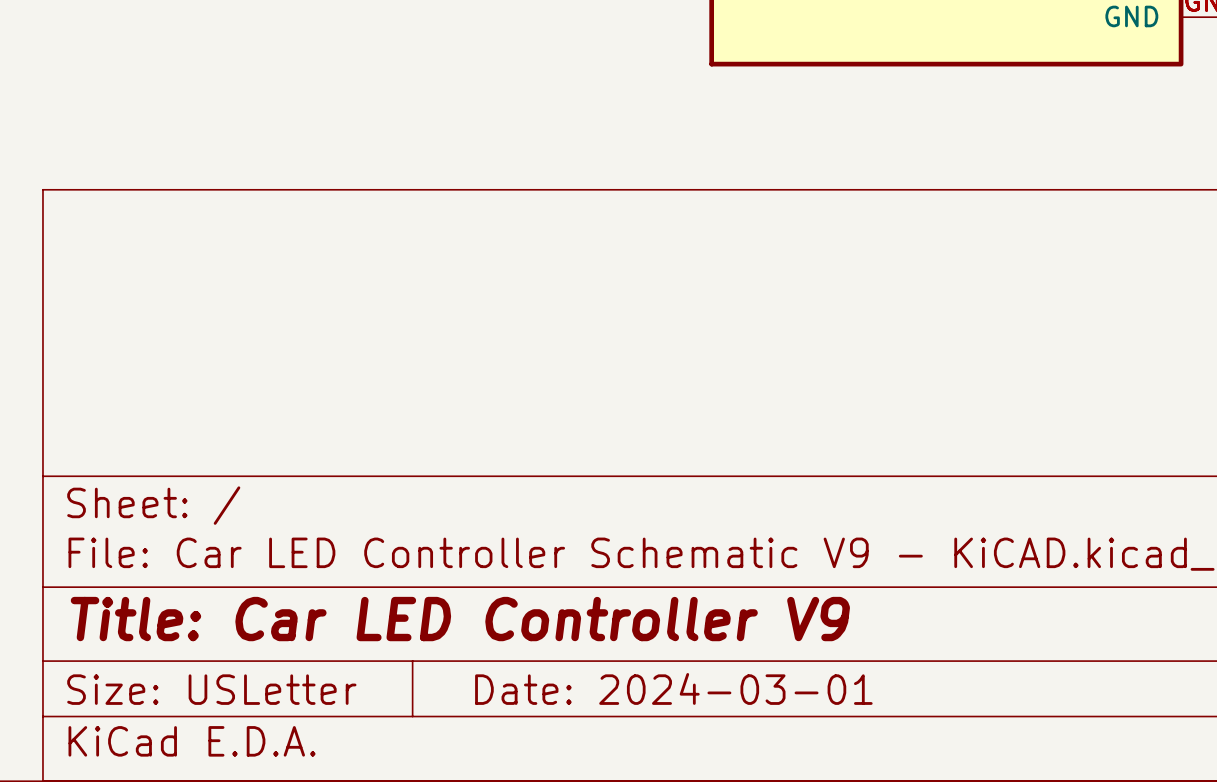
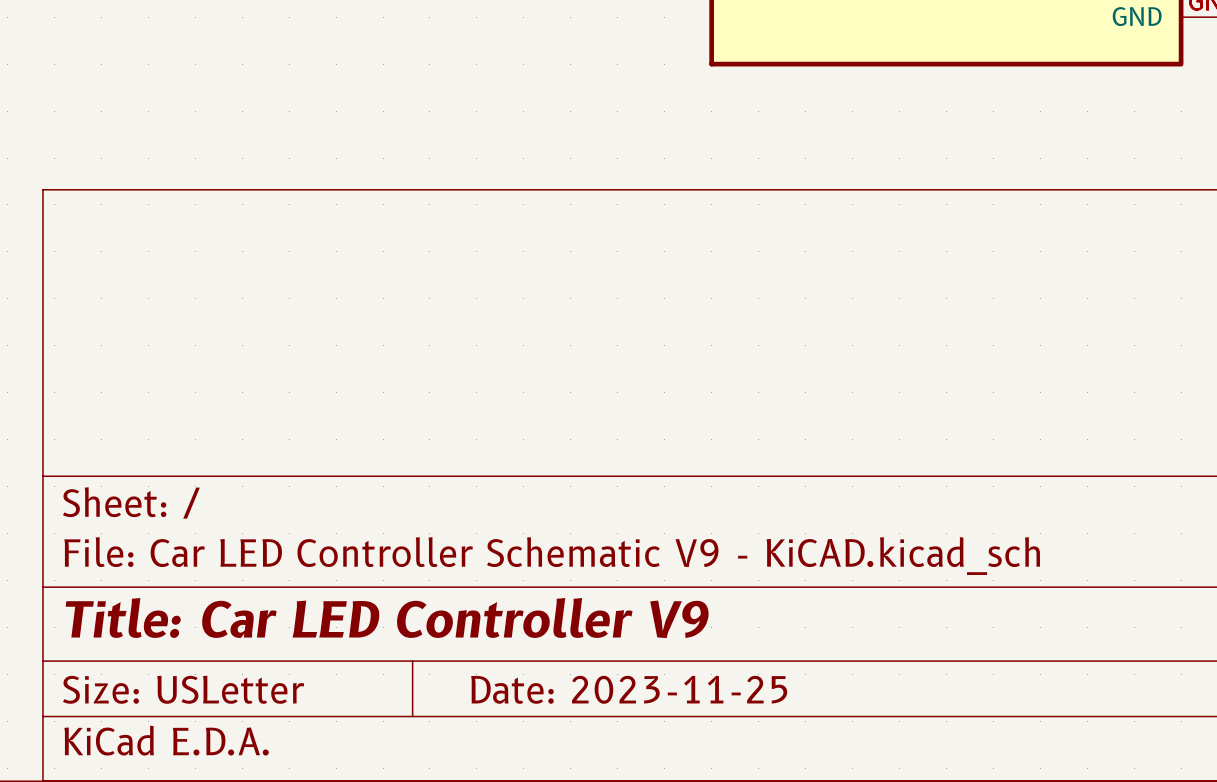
title block: Date: 2024-03-01 (673, 688) -> Date: 2023-11-25 (629, 689)

